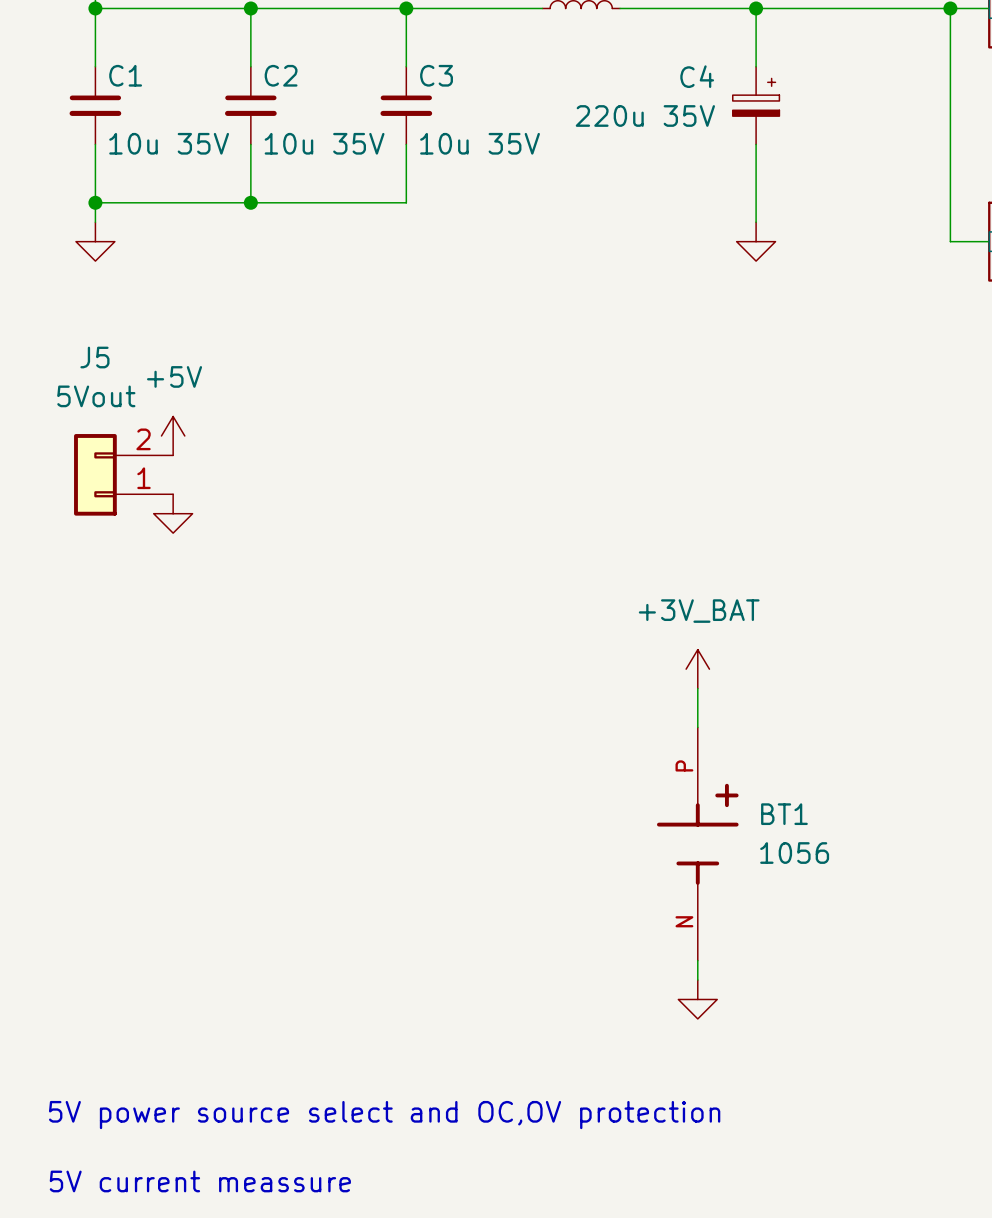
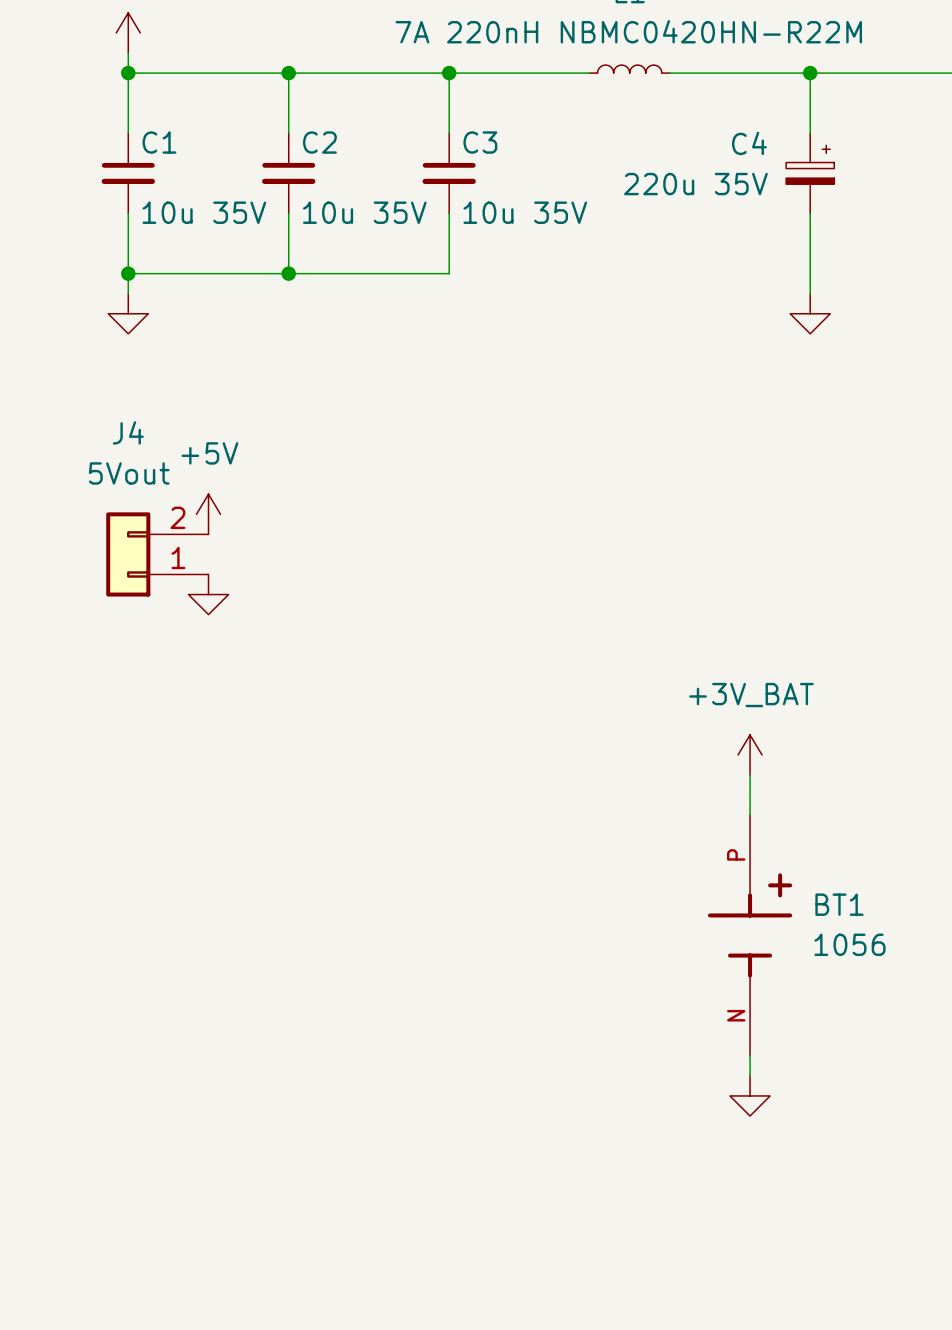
J5 name: J5 (94, 357) -> J4 (128, 432)
text: 5V power source select and OC,OV protection (384, 1115) -> none
text: 5V current meassure (200, 1181) -> none

